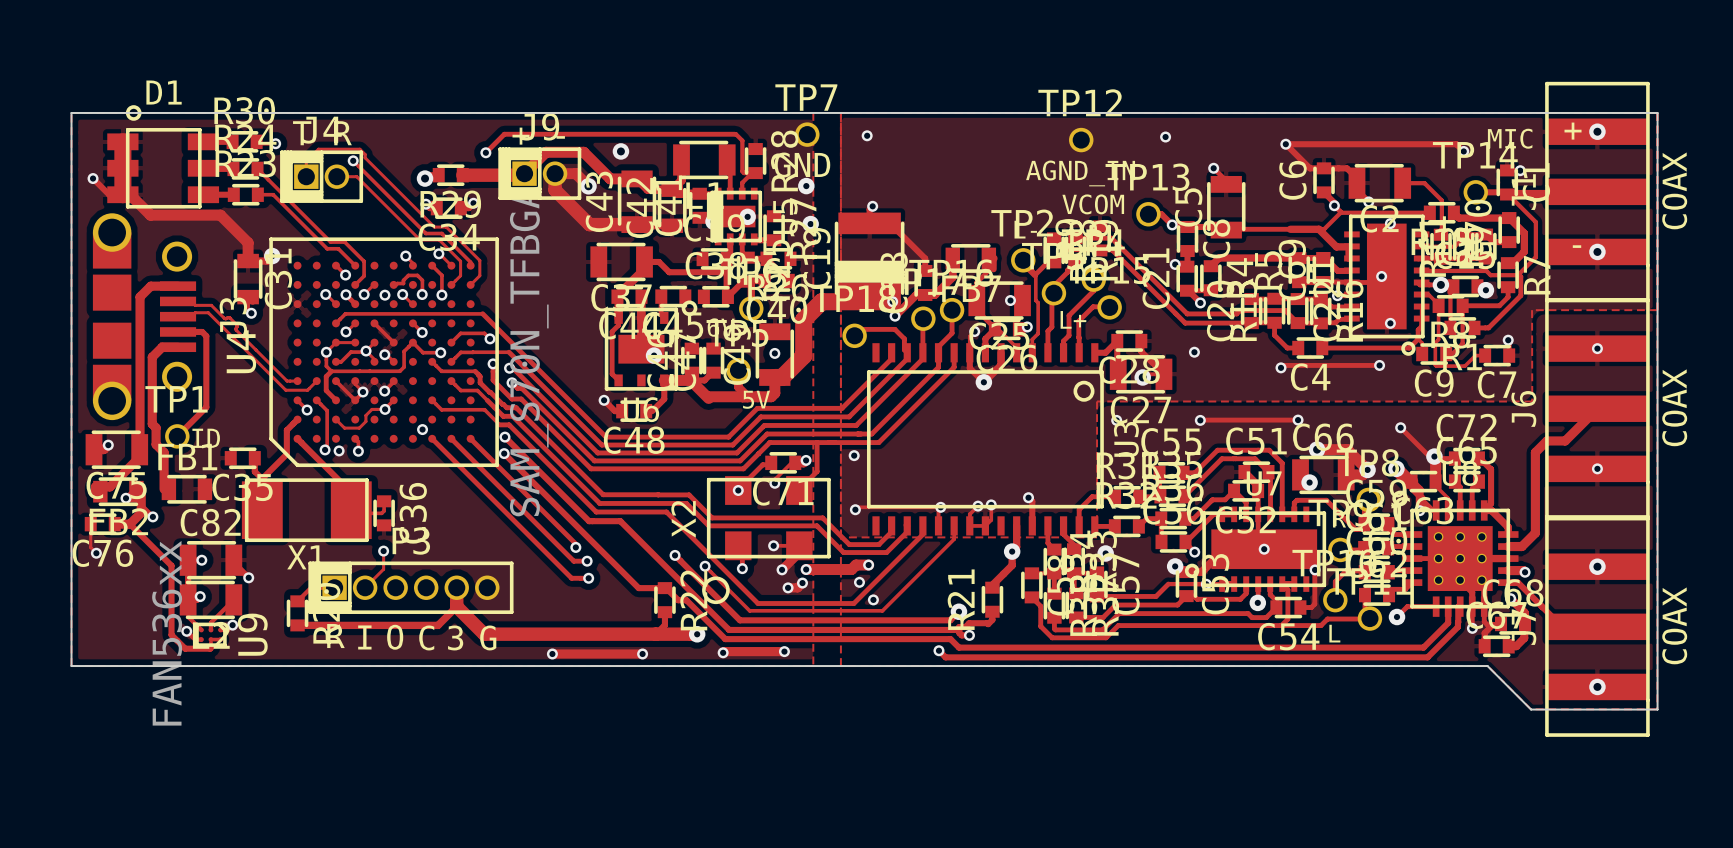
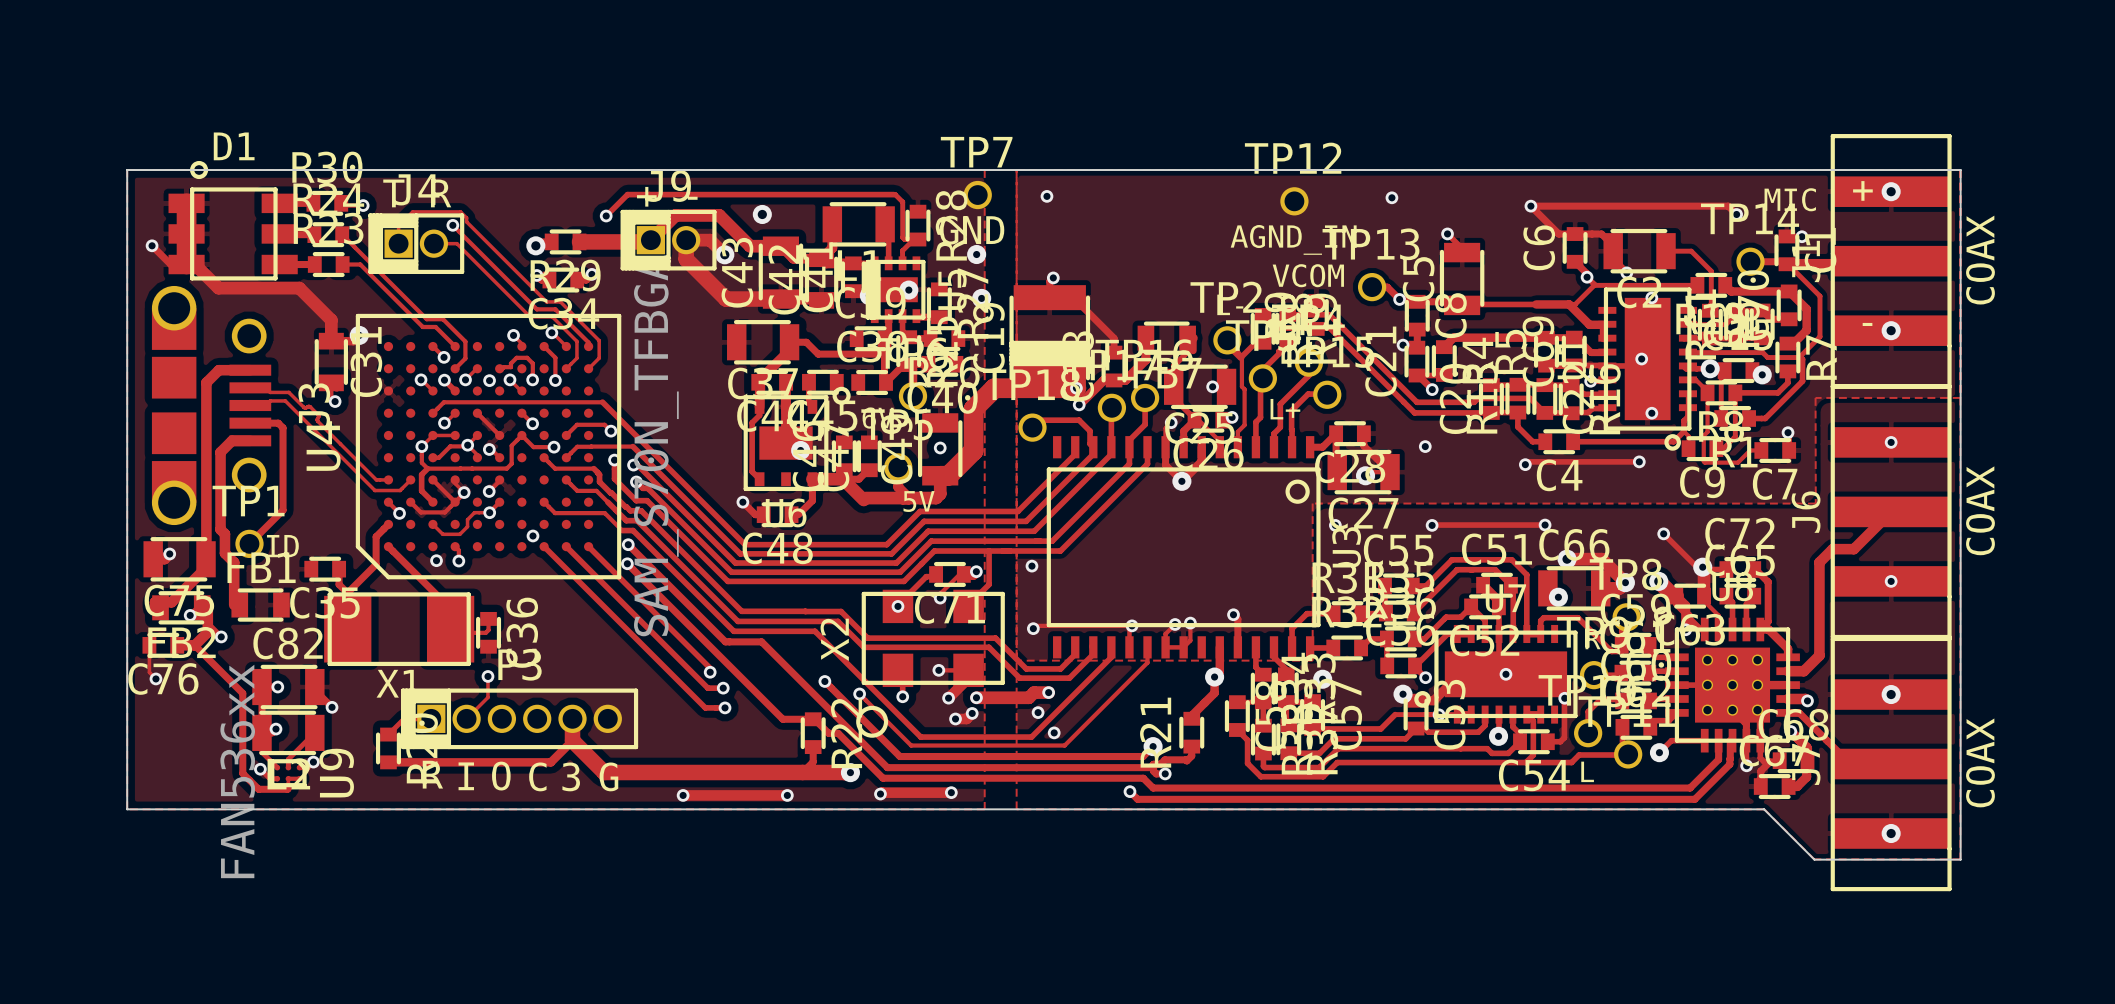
track: (325, 409) (327, 410) (325, 450) -> (420, 512) (444, 512) (455, 502)
via: (325, 449) -> none

